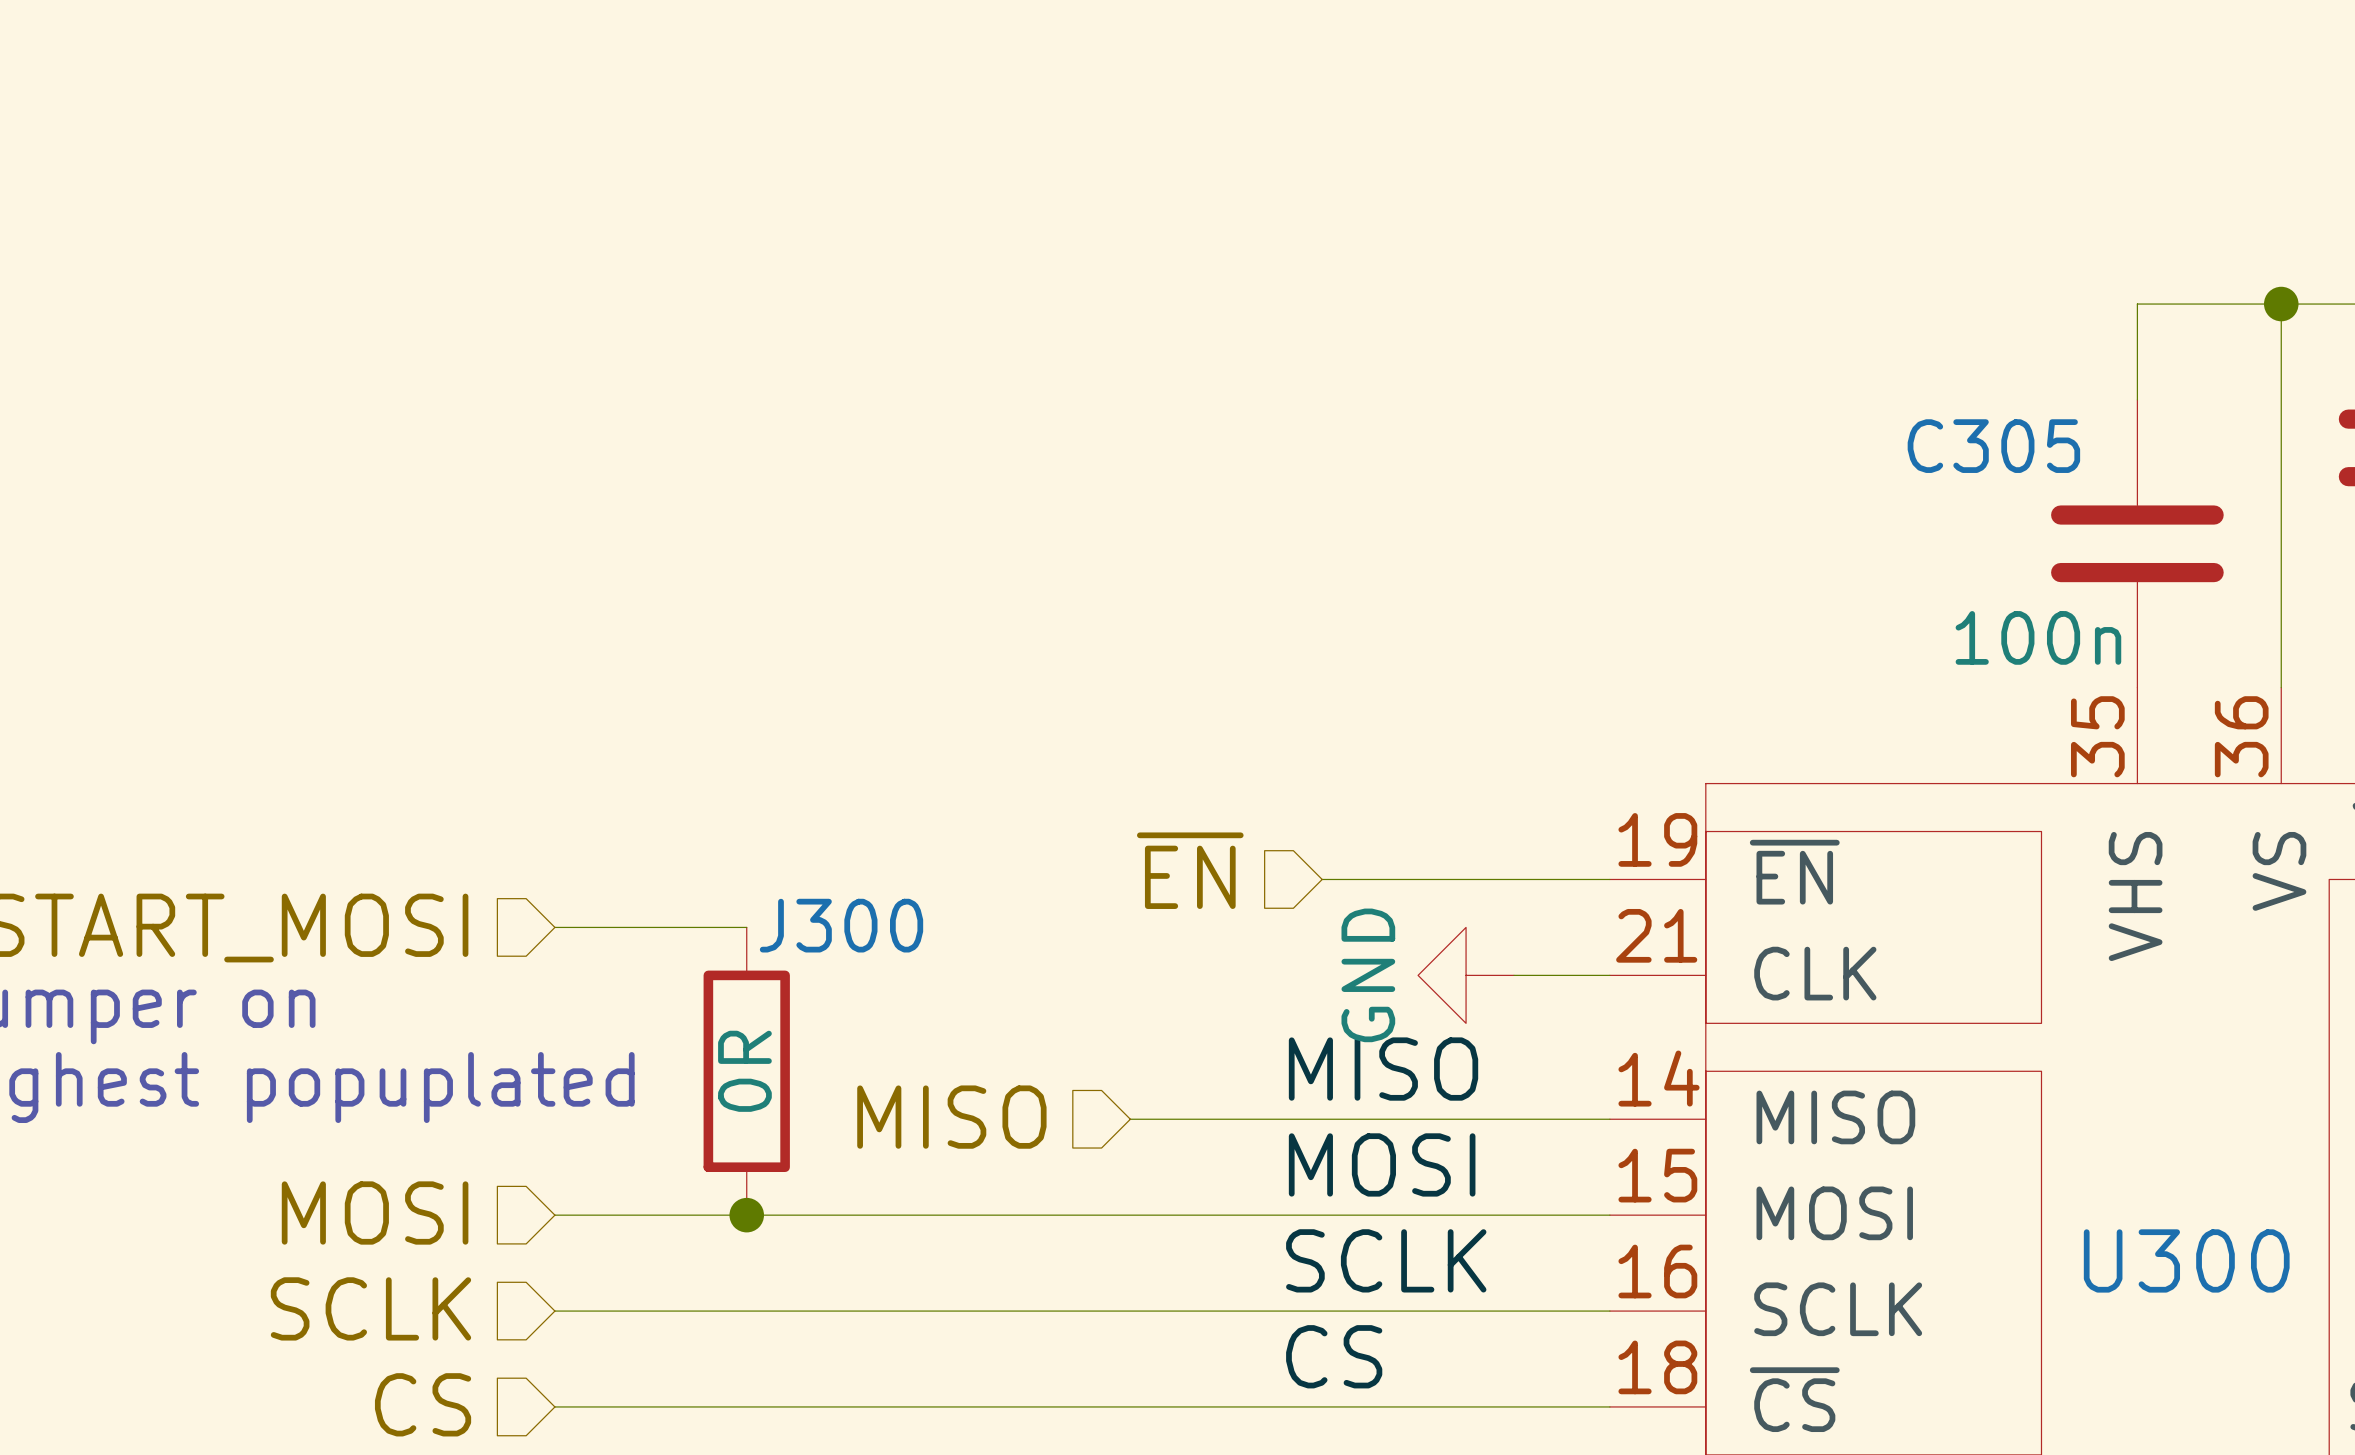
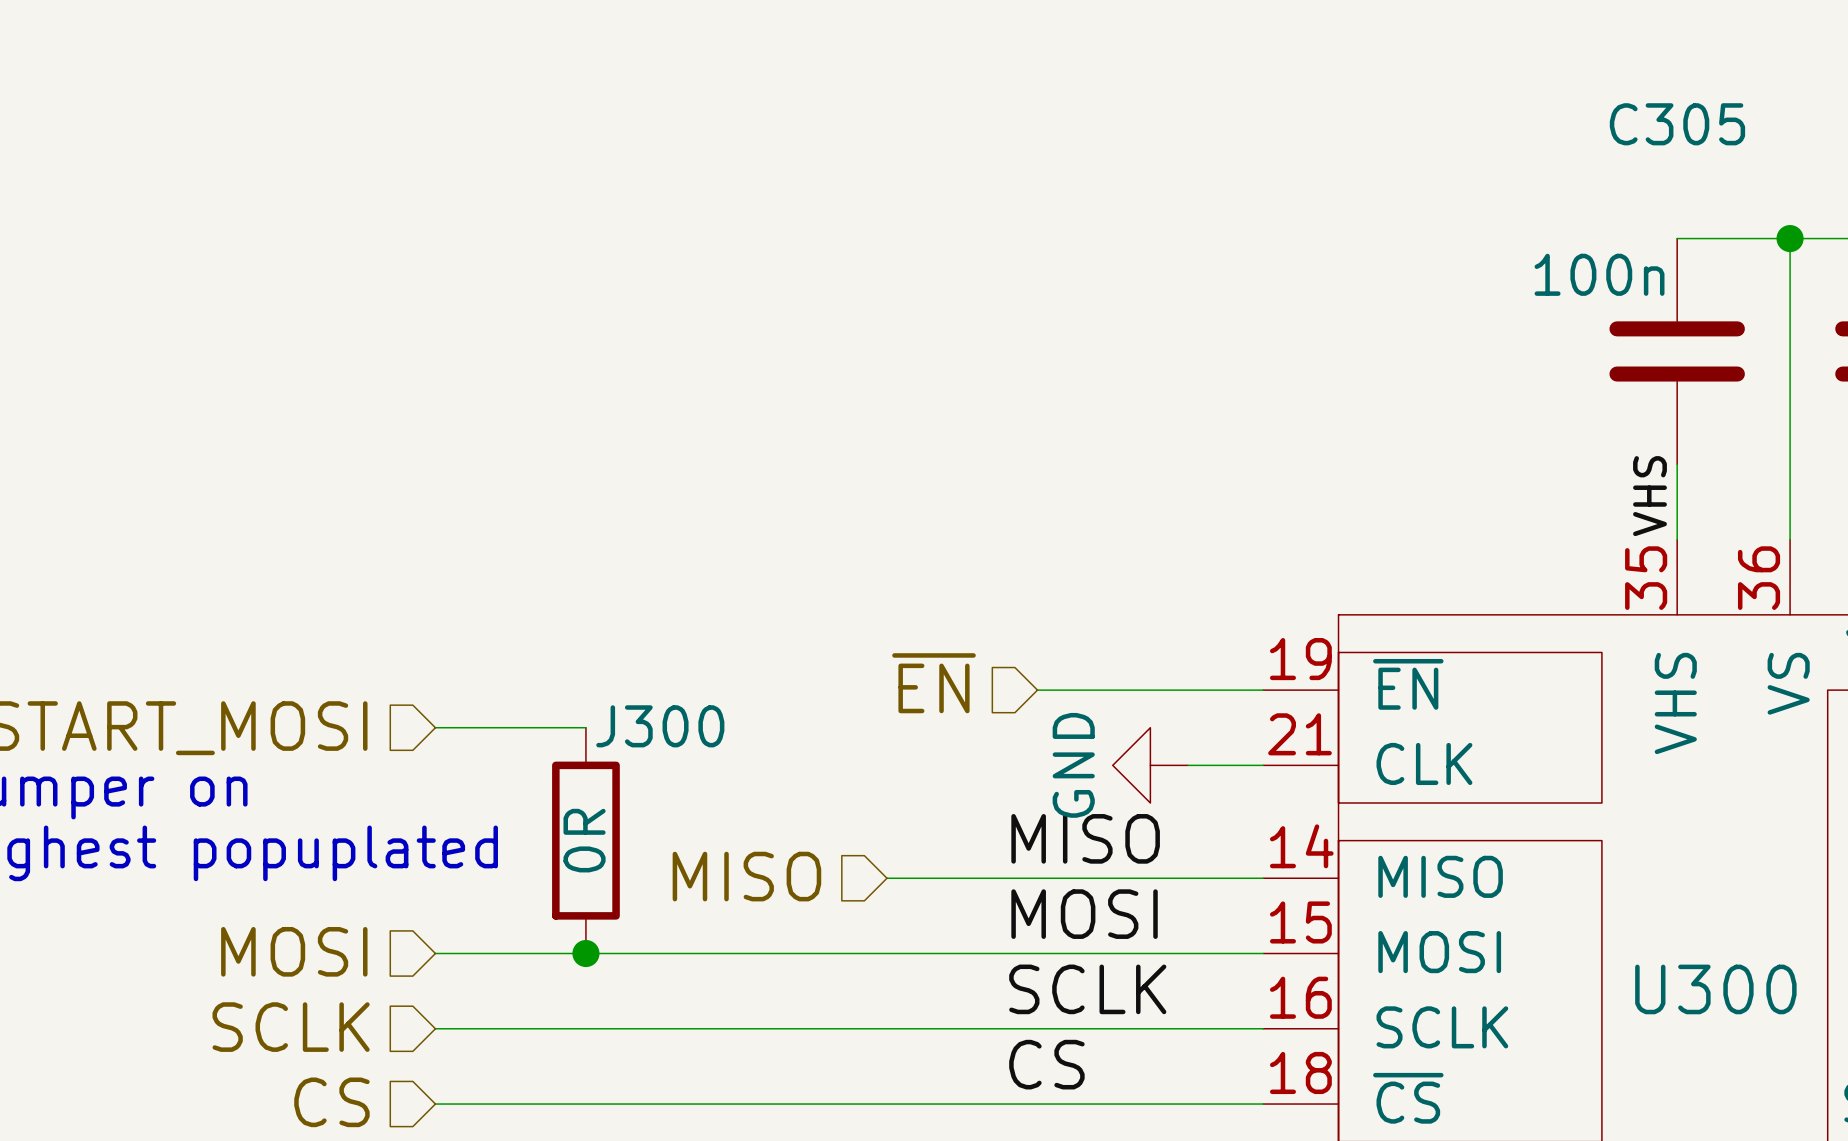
C305 name position: C305 (1993, 446) -> C305 (1677, 124)
C305 position: (2137, 543) -> (1677, 351)
label: none -> VHS (1649, 496)
C305 value position: 100n (2038, 637) -> 100n (1599, 274)

